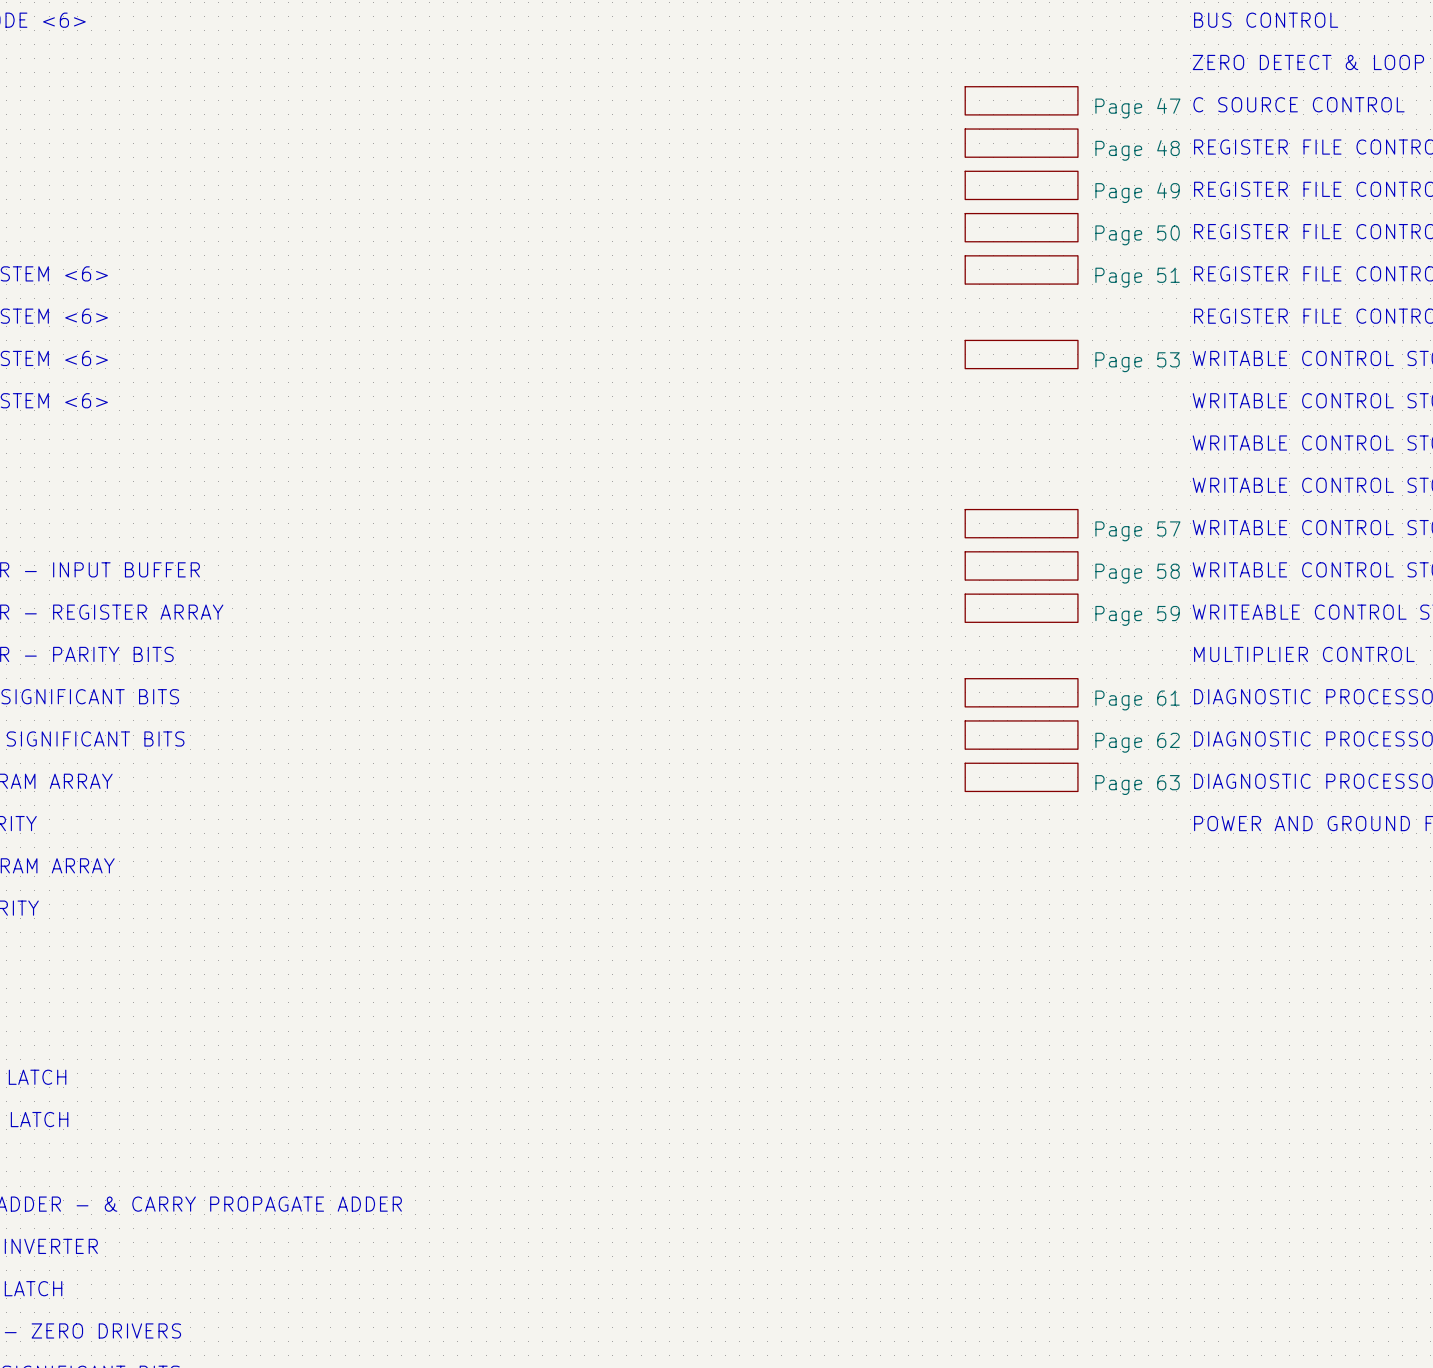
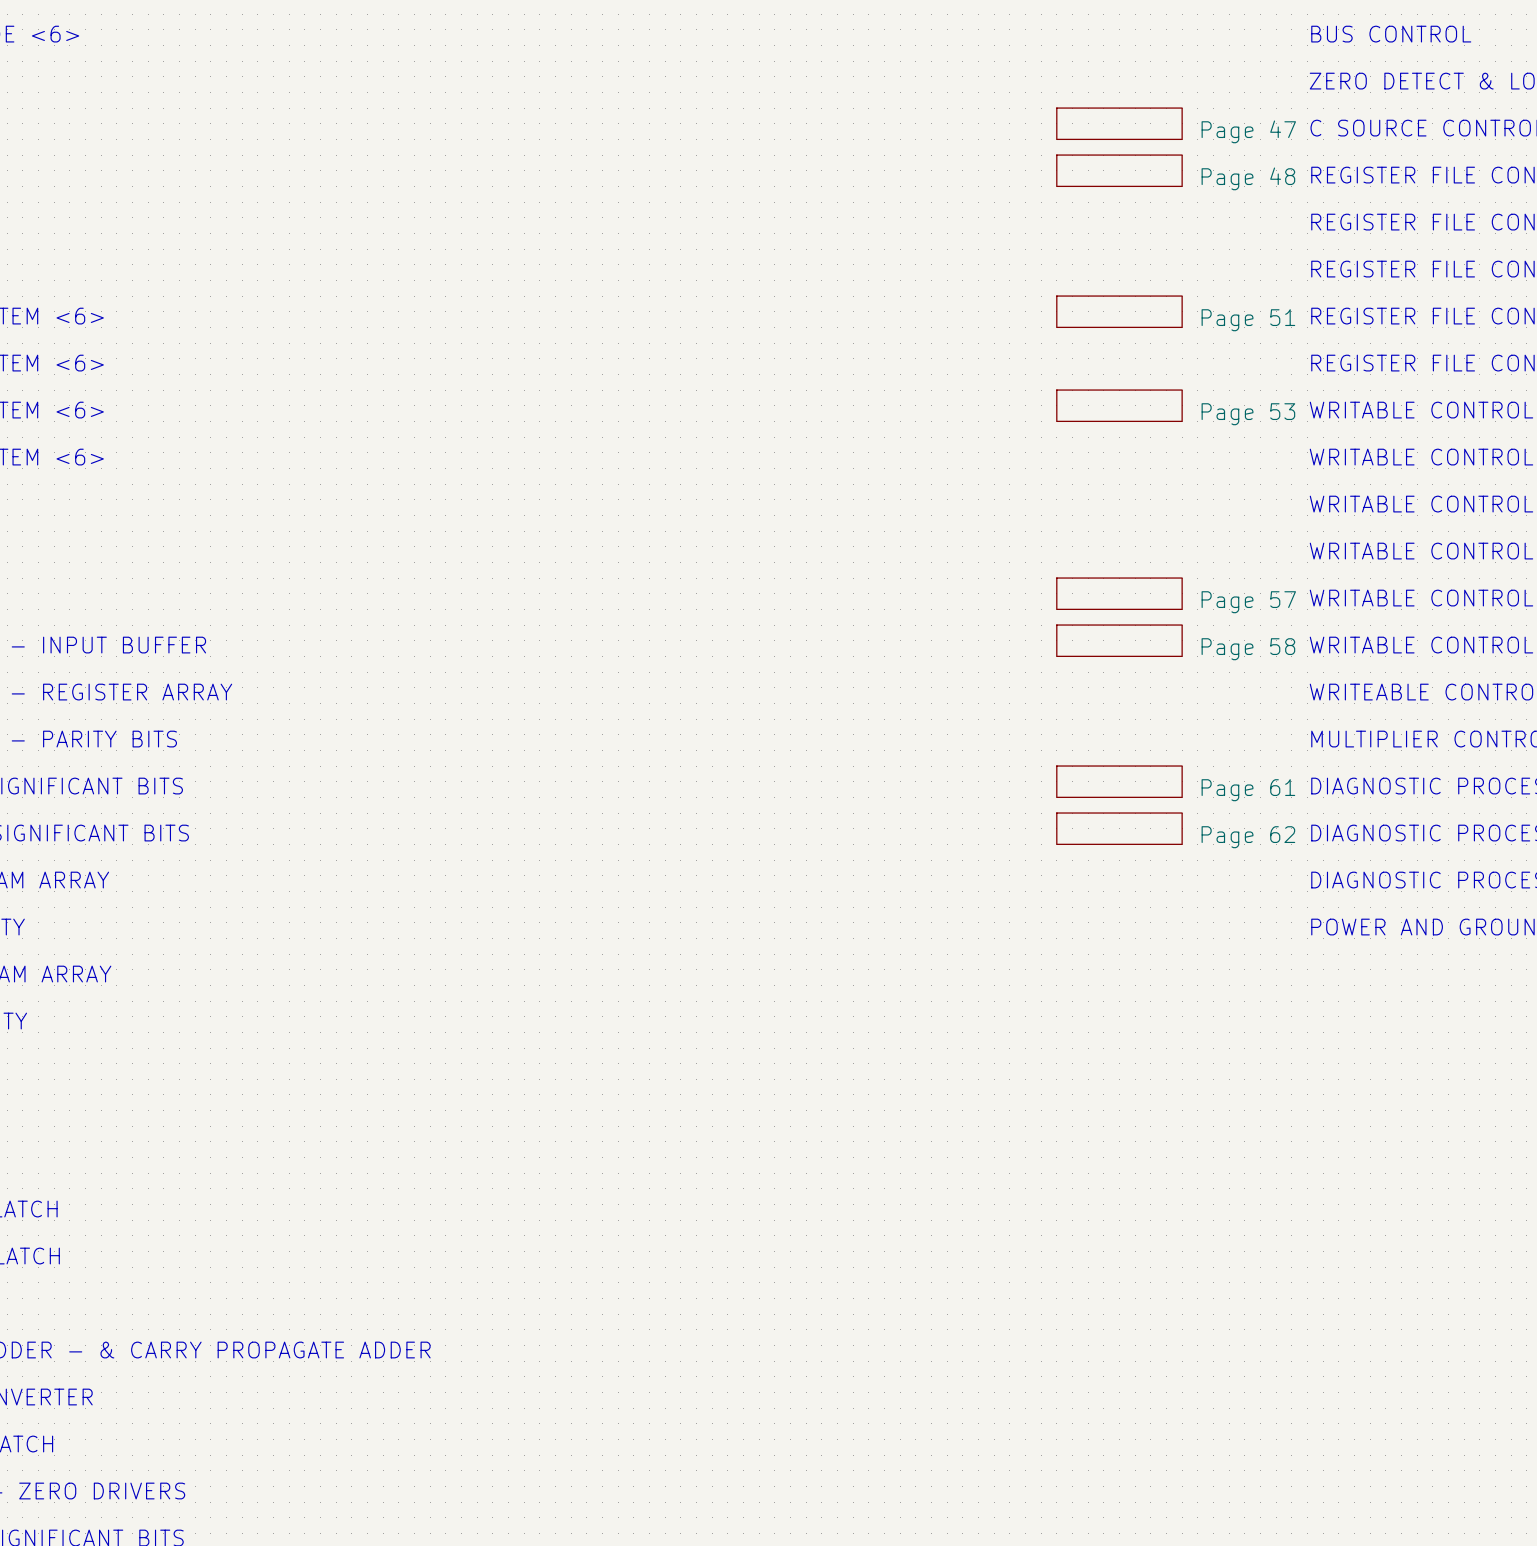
sheet Page 49: (1021, 185) -> none
sheet Page 50: (1021, 227) -> none
sheet Page 59: (1021, 608) -> none
sheet Page 63: (1021, 777) -> none

